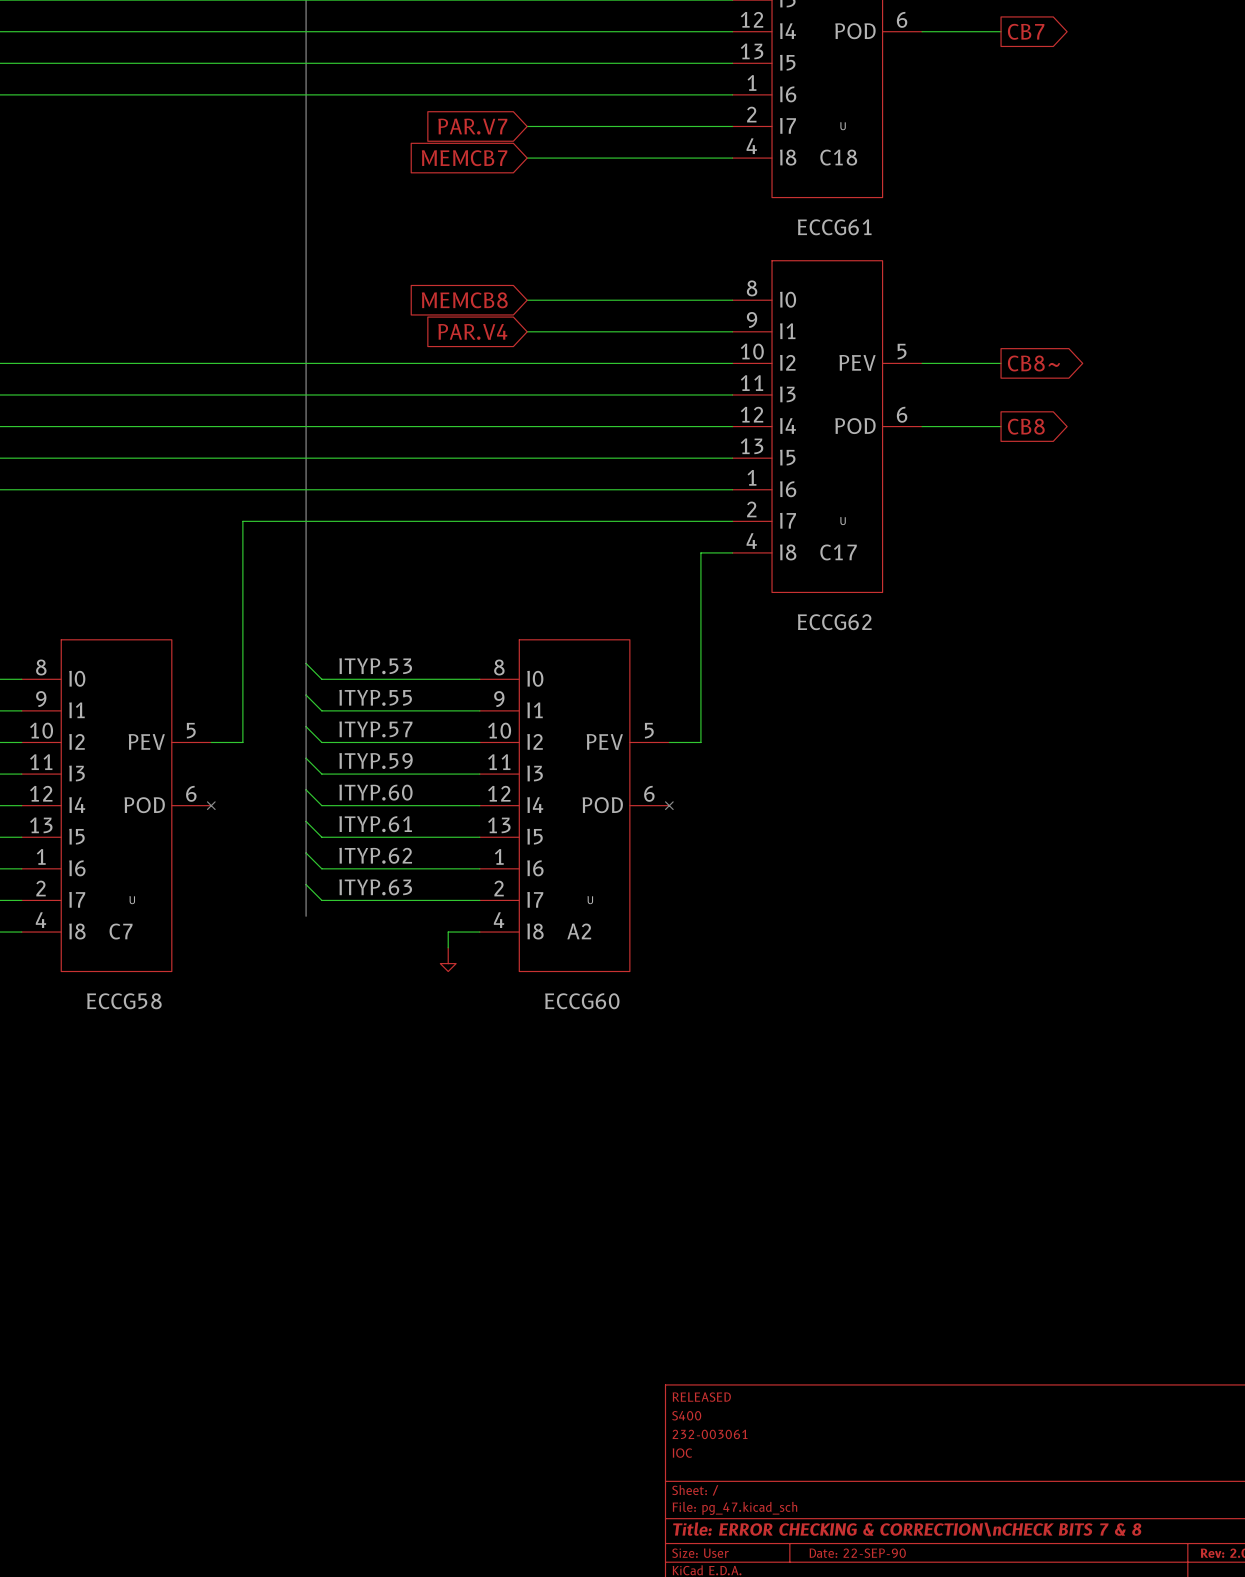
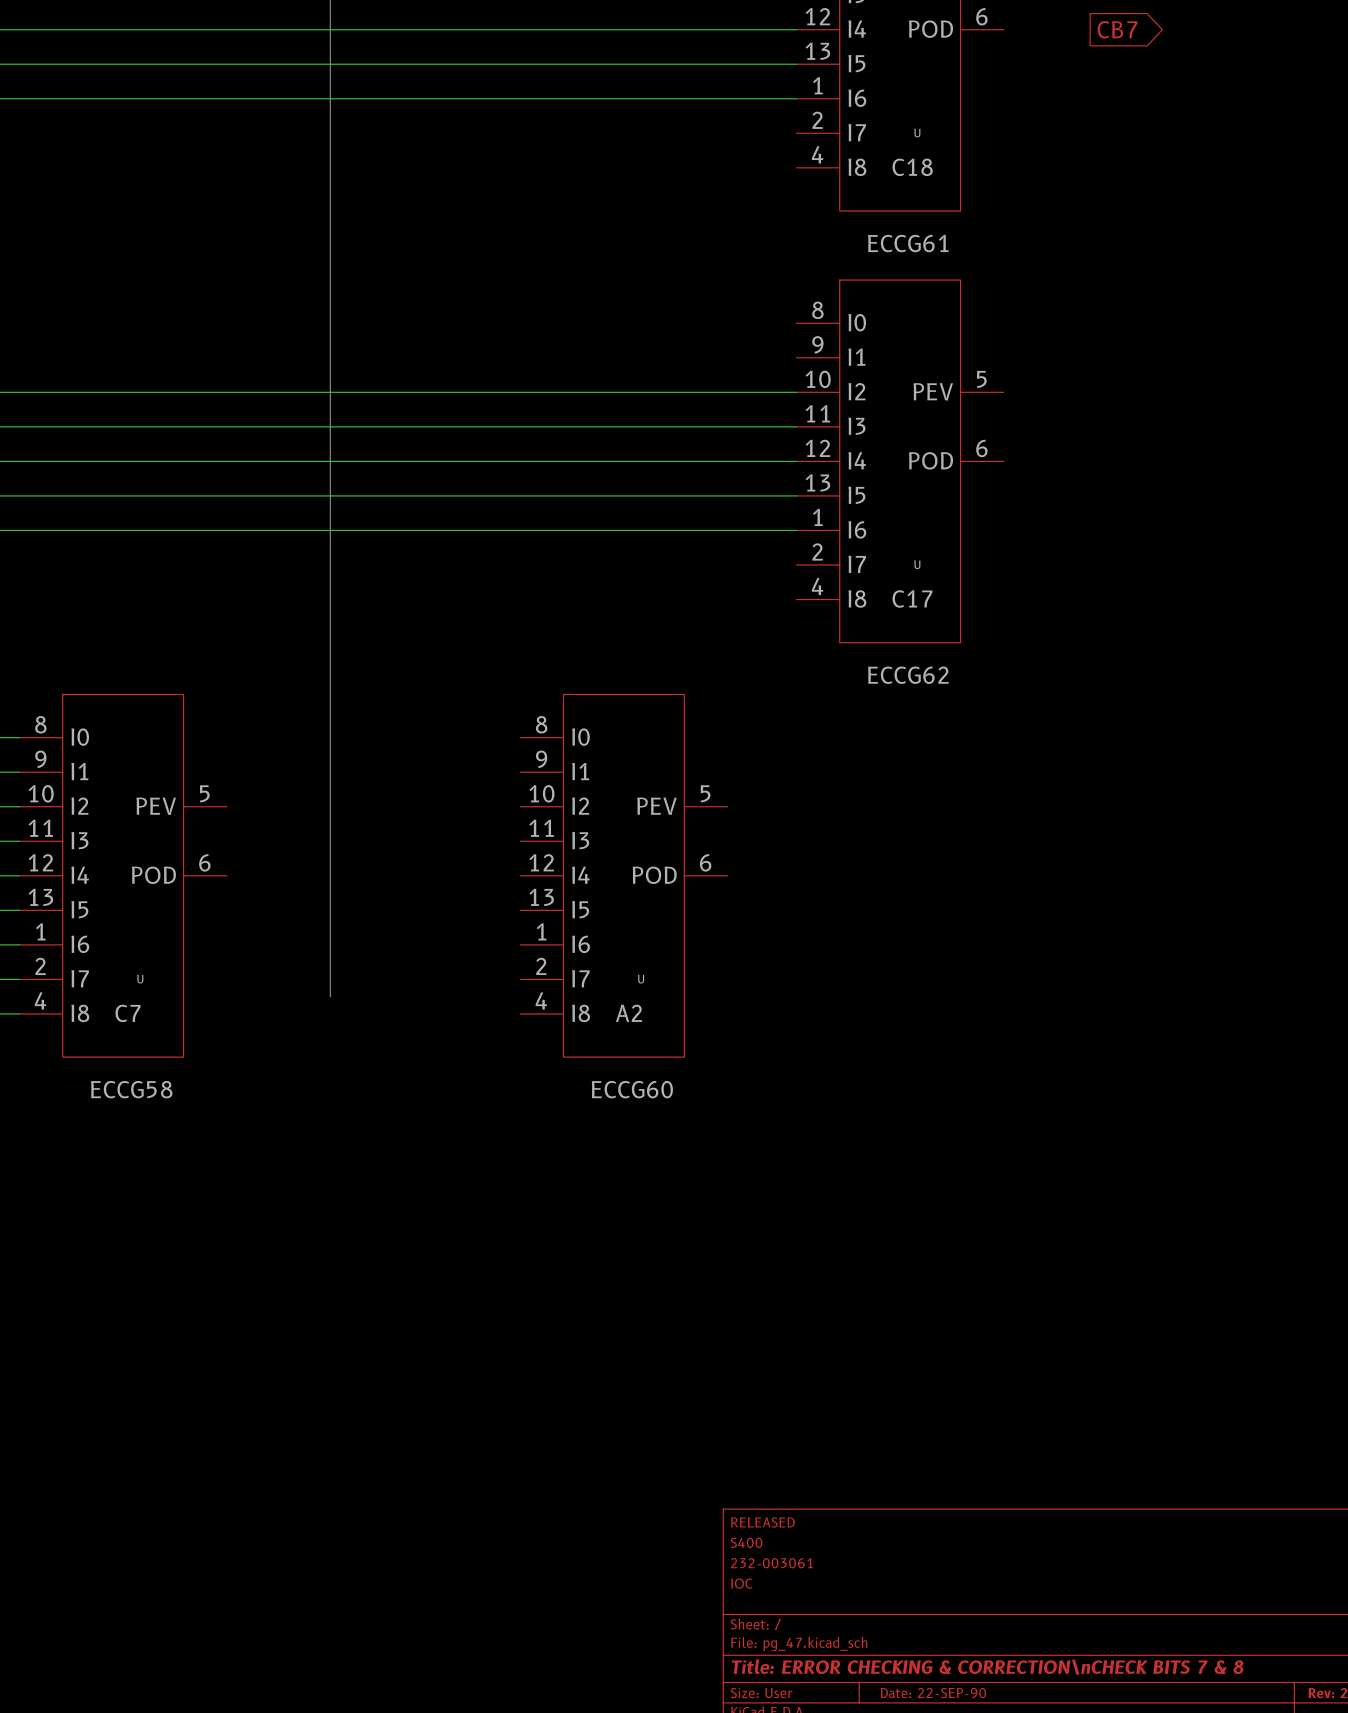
wire: (922, 31) (1001, 31) -> none
global label: PAR.V7 (472, 126) -> none
wire: (527, 126) (732, 126) -> none
global label: MEMCB7 (464, 158) -> none
wire: (527, 158) (732, 158) -> none
global label: MEMCB8 (464, 300) -> none
wire: (527, 300) (732, 300) -> none
global label: PAR.V4 (472, 331) -> none
wire: (527, 331) (732, 331) -> none
wire: (922, 363) (1001, 363) -> none
global label: CB8~ (1033, 363) -> none
wire: (922, 426) (1001, 426) -> none
global label: CB8 (1026, 426) -> none
wire: (732, 521) (242, 521) (242, 742) (211, 742) -> none
wire: (732, 552) (700, 552) (700, 742) (669, 742) -> none
wire: (306, 663) (321, 679) (479, 679) -> none
label: ITYP.53 (375, 666) -> none
wire: (306, 695) (321, 710) (479, 710) -> none
label: ITYP.55 (375, 697) -> none
wire: (306, 726) (321, 742) (479, 742) -> none
label: ITYP.57 (375, 729) -> none
wire: (306, 758) (321, 774) (479, 774) -> none
label: ITYP.59 (376, 761) -> none
wire: (306, 789) (321, 805) (479, 805) -> none
label: ITYP.60 (375, 792) -> none
no-connect mark: (211, 805) -> none
no-connect mark: (669, 805) -> none
wire: (306, 821) (321, 837) (479, 837) -> none
label: ITYP.61 (375, 824) -> none
wire: (306, 853) (321, 868) (479, 868) -> none
label: ITYP.62 (375, 855) -> none
wire: (306, 884) (321, 900) (479, 900) -> none
label: ITYP.63 (375, 887) -> none
wire: (479, 932) (448, 932) (448, 947) -> none
power symbol: (448, 959) -> none

